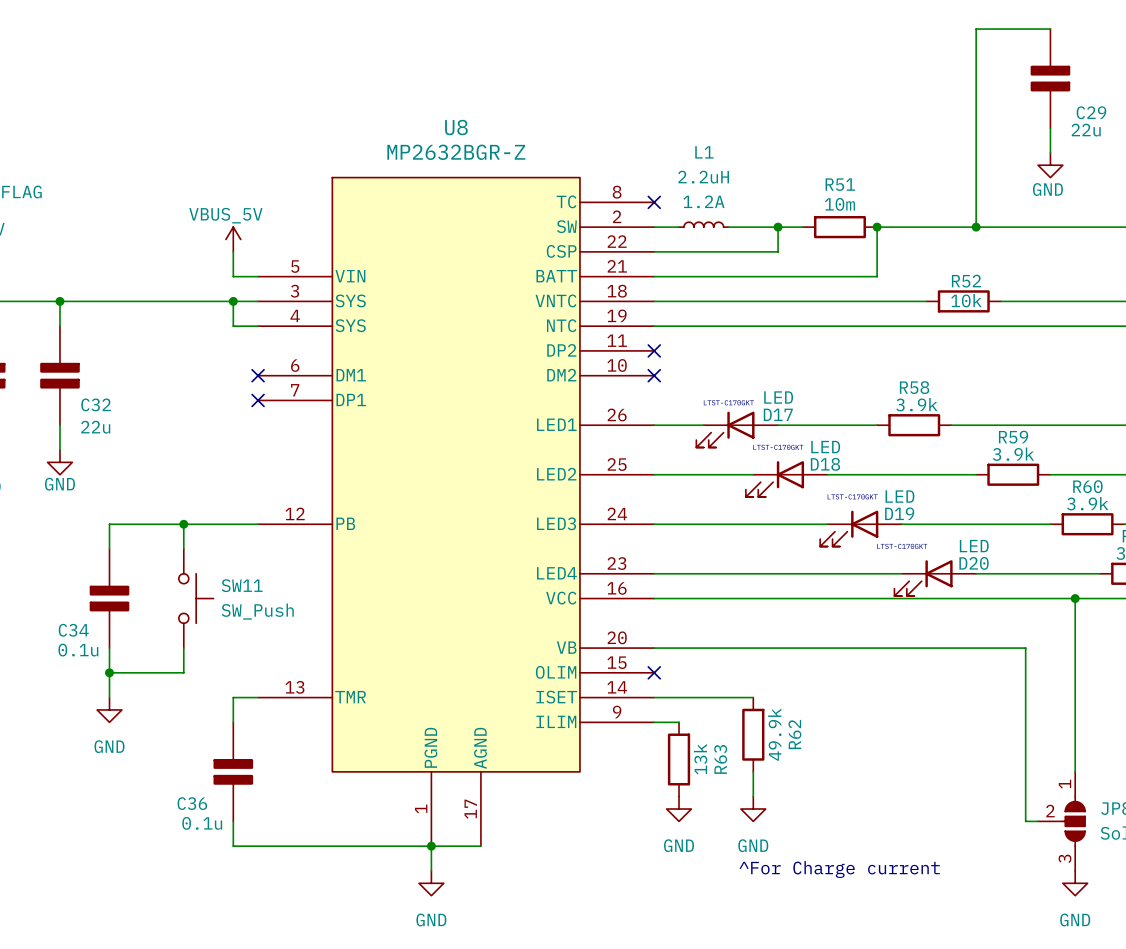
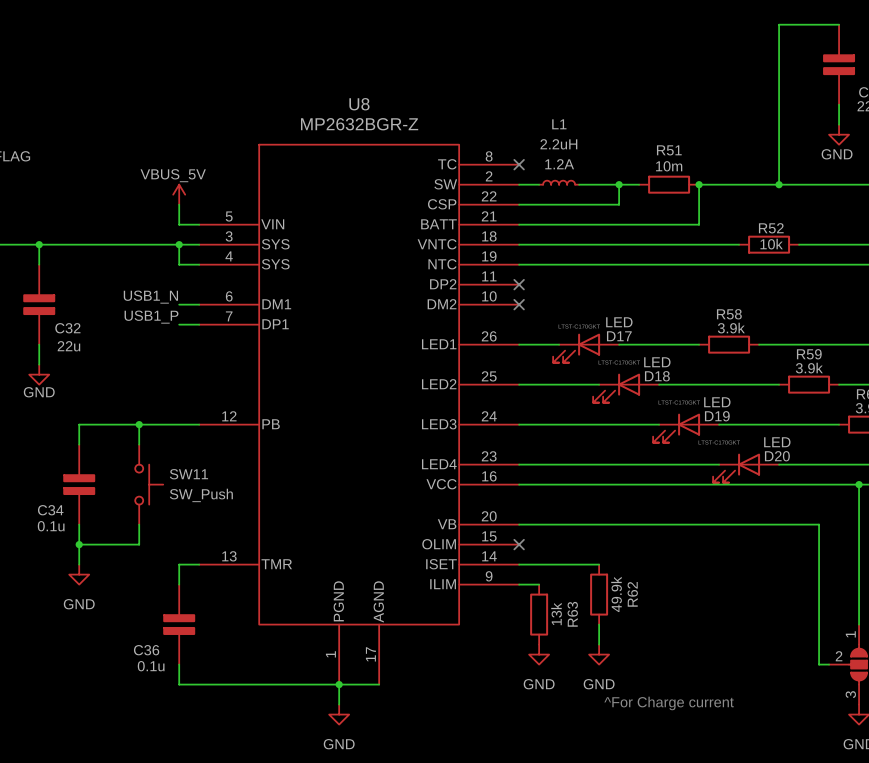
label: none -> USB1_N (150, 297)
wire: none -> (179, 304) (199, 304)
no-connect mark: (258, 375) -> none
label: none -> USB1_P (151, 317)
wire: none -> (179, 324) (199, 324)
no-connect mark: (258, 400) -> none

